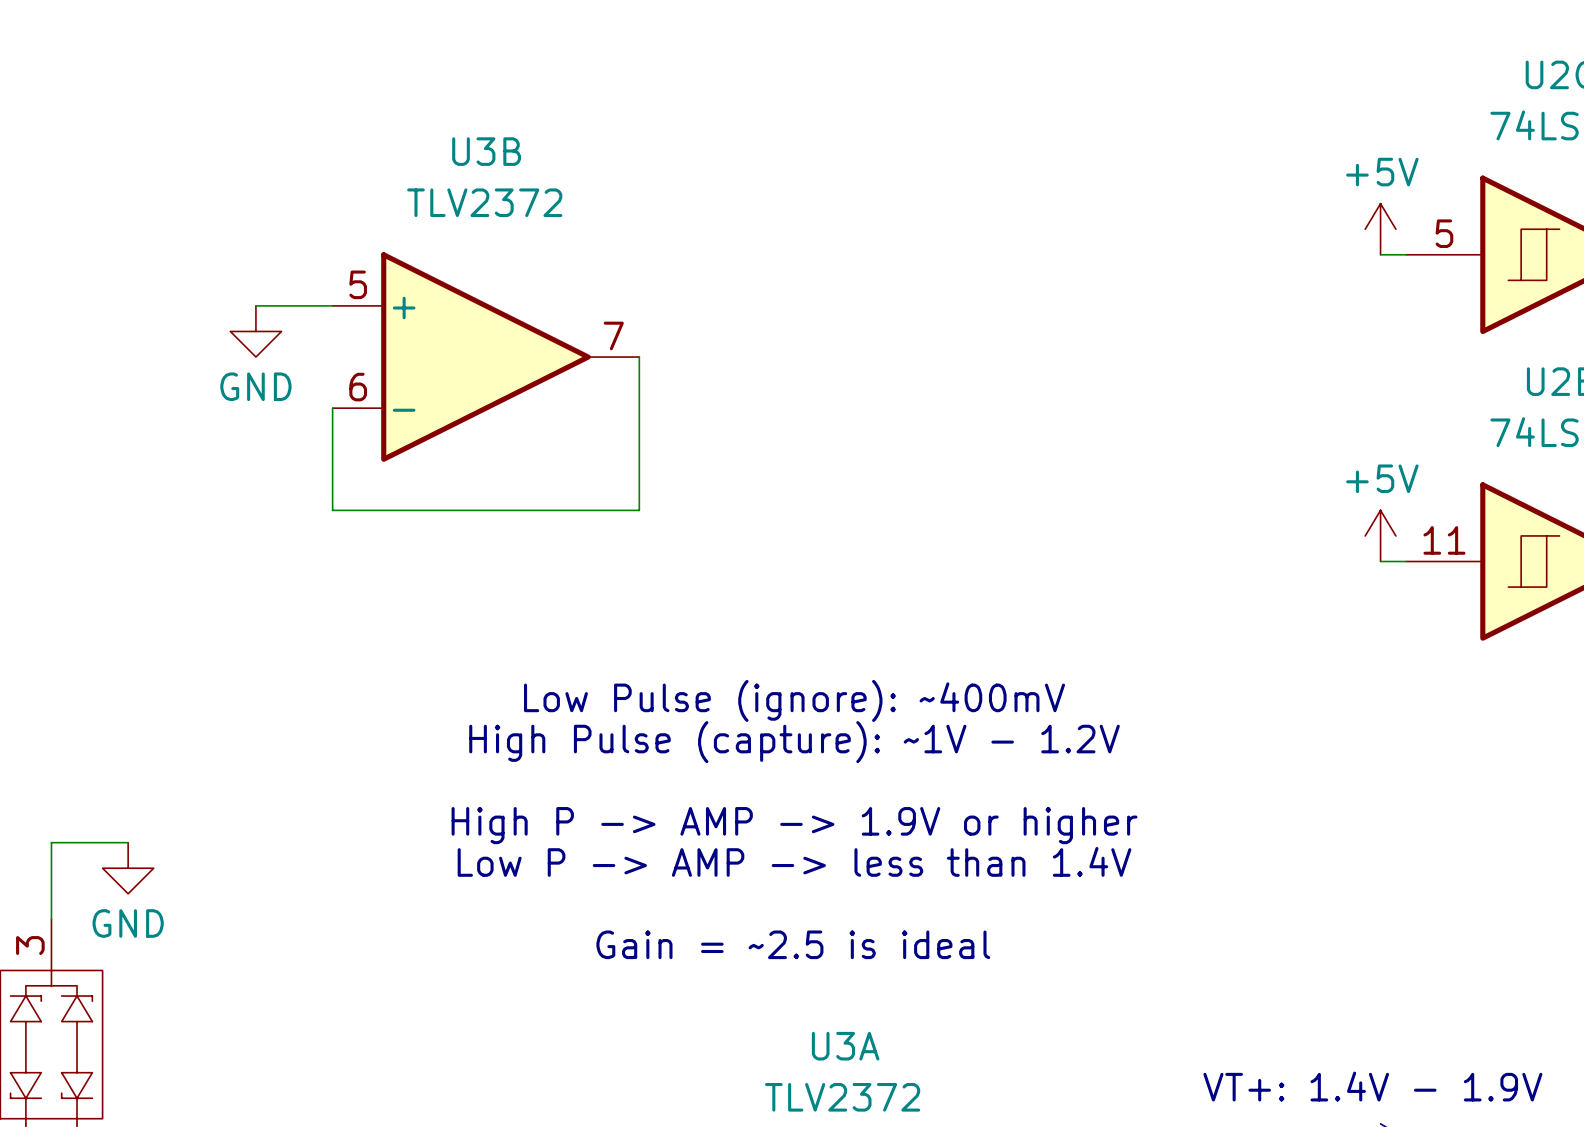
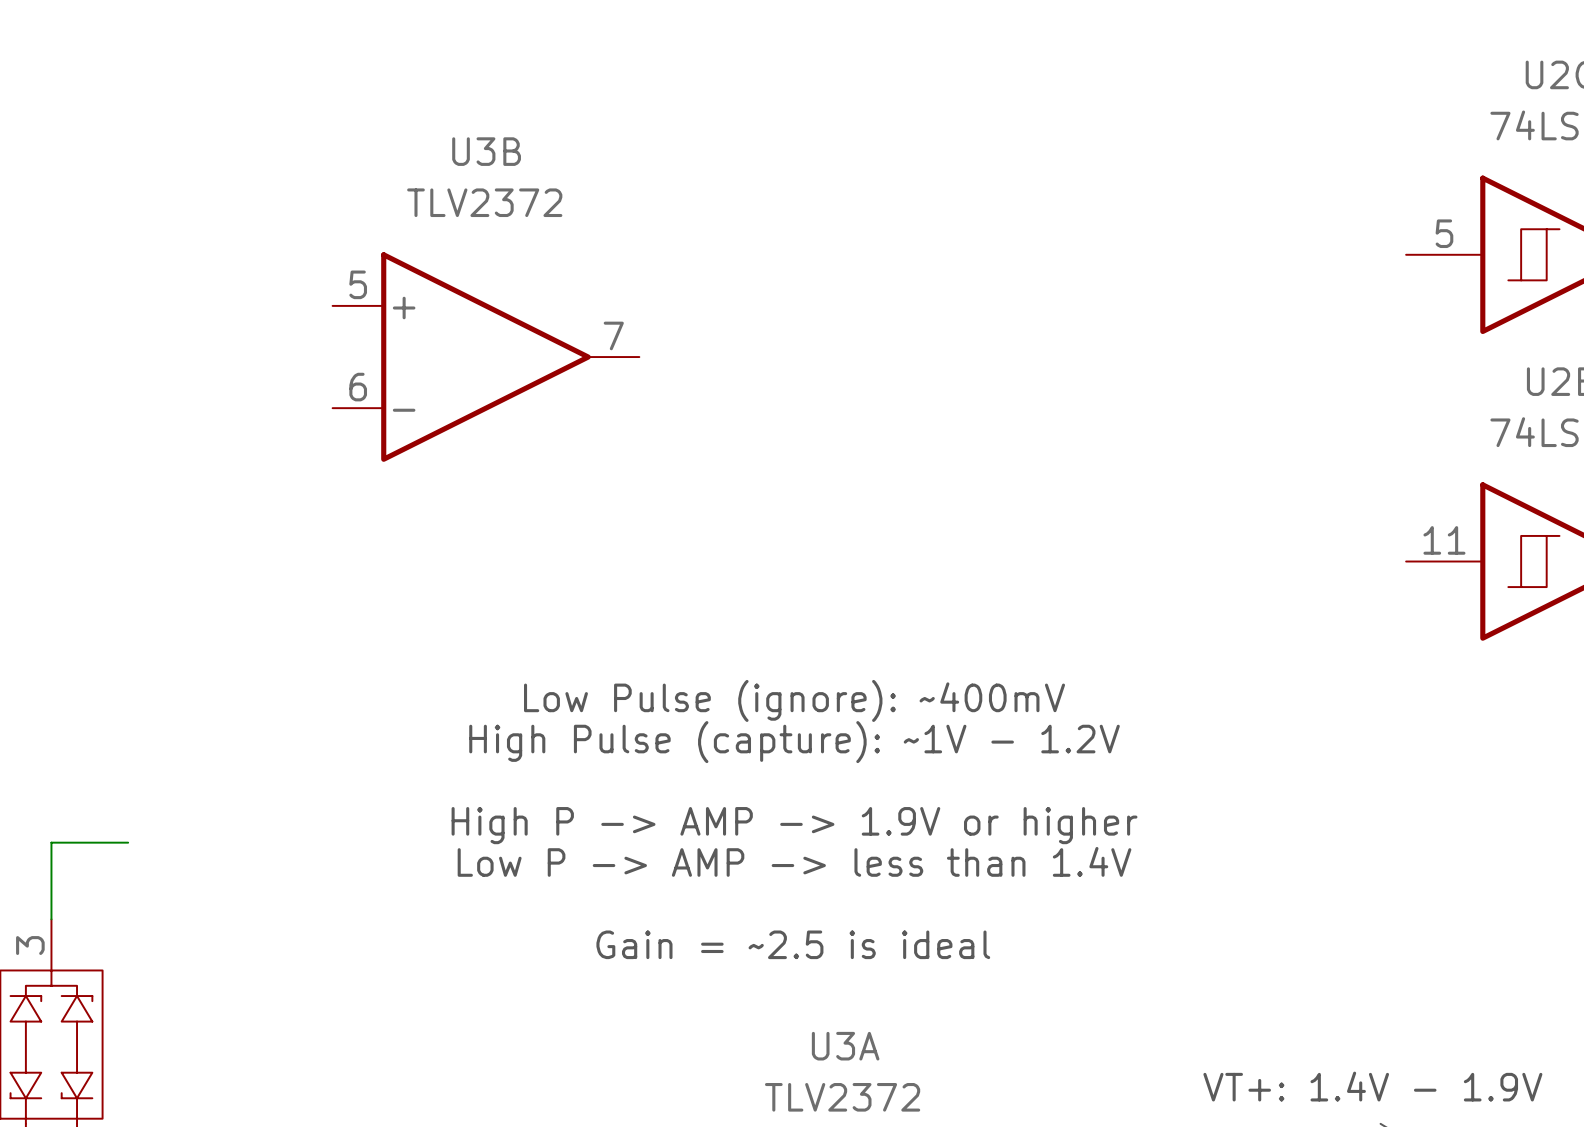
power symbol: +5V (1380, 229) -> none
wire: (1380, 254) (1406, 254) -> none
wire: (255, 305) (332, 305) -> none
power symbol: GND (255, 331) -> none
wire: (639, 357) (639, 510) (332, 510) (332, 408) -> none
power symbol: +5V (1380, 535) -> none
wire: (1380, 561) (1406, 561) -> none
power symbol: GND (128, 868) -> none

